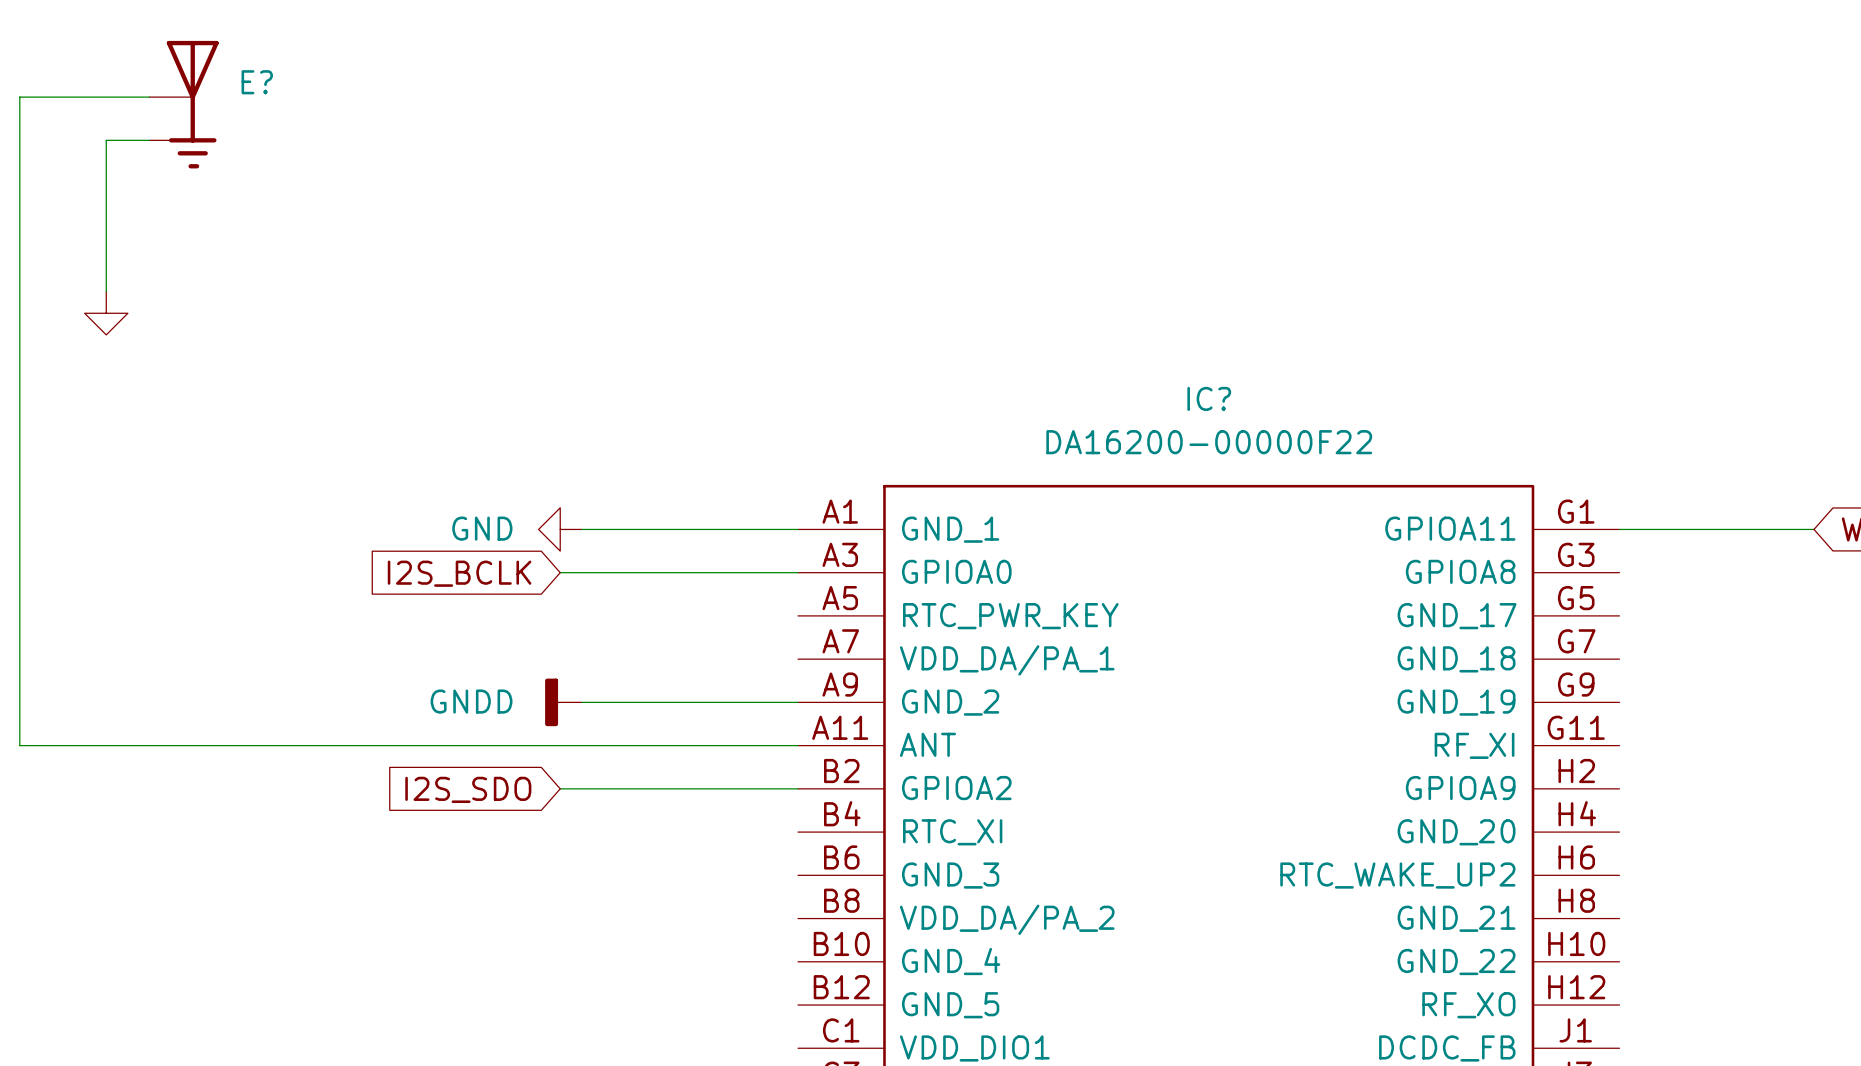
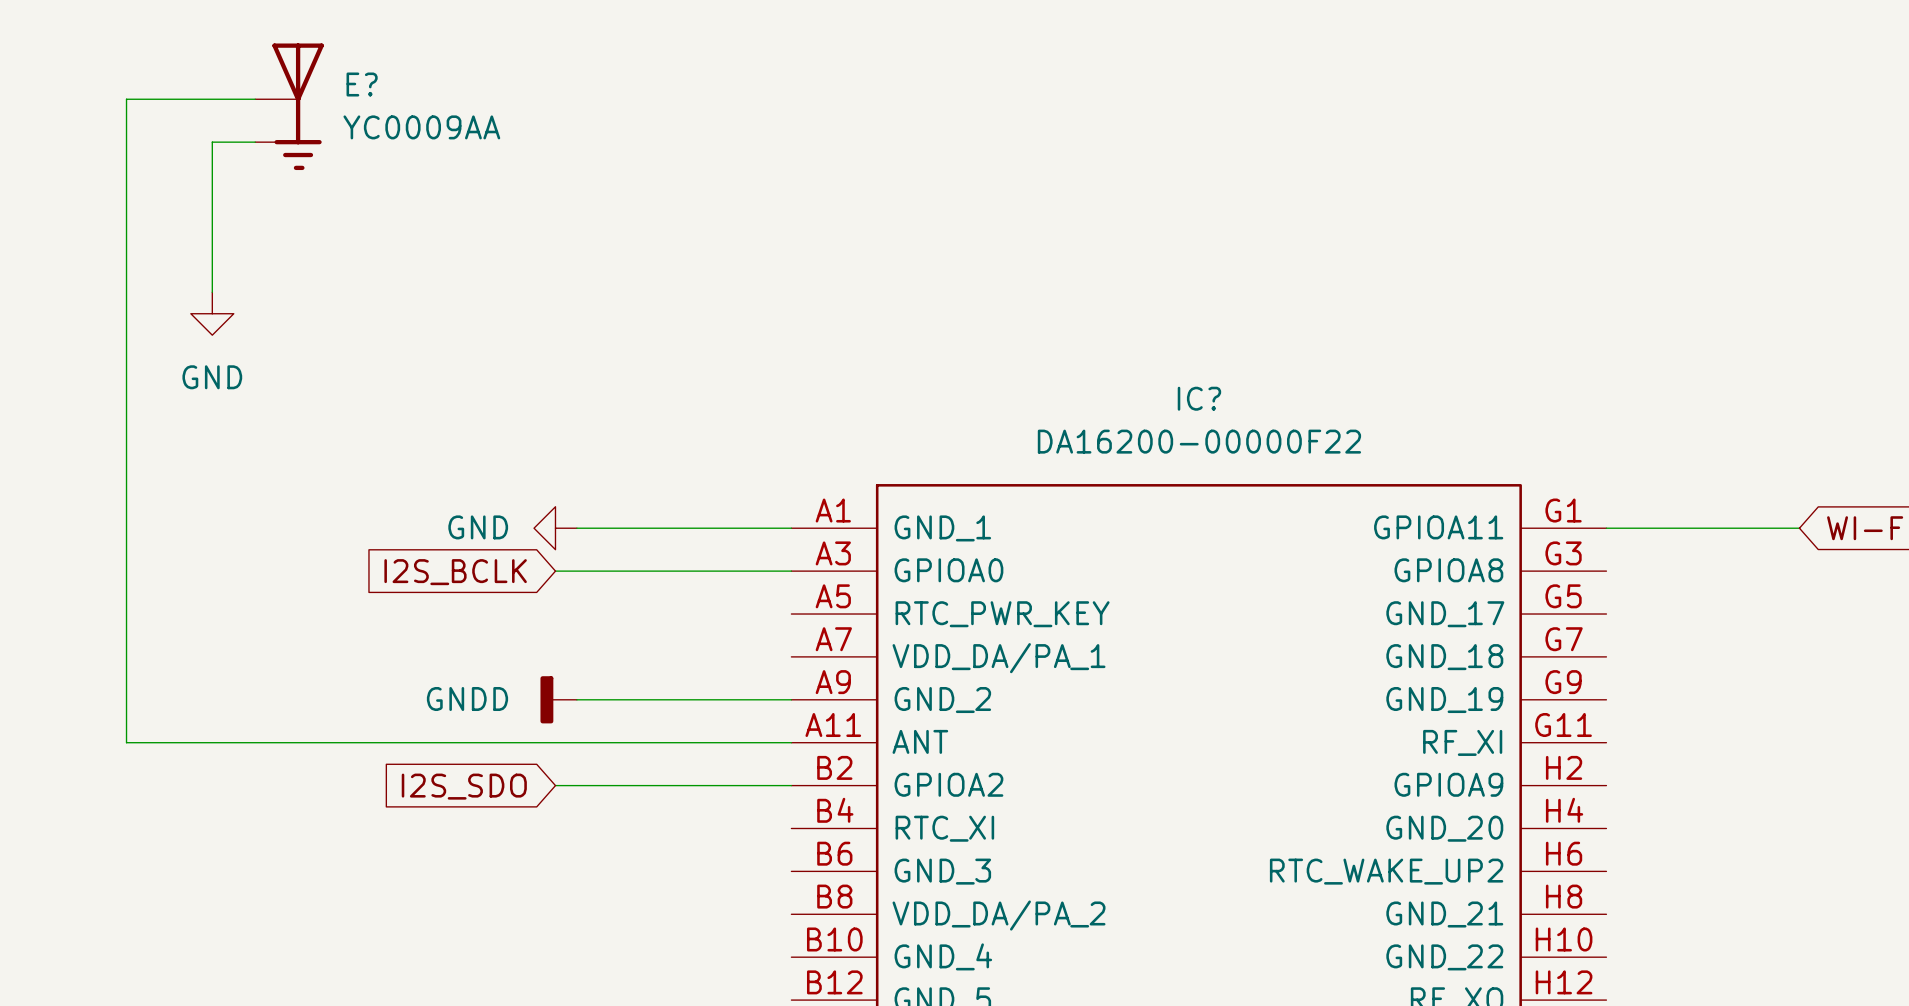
wire: (127, 97) (19, 97) (19, 745) (127, 745) -> (126, 99) (126, 742)
wire: none -> (147, 99) (255, 99)
E?: (184, 104) -> none
E?: none -> YC0009AA (289, 106)
wire: (149, 140) (106, 140) (106, 291) -> (255, 142) (212, 142) (212, 292)
power symbol: (106, 313) -> none
power symbol: none -> GND (212, 313)

